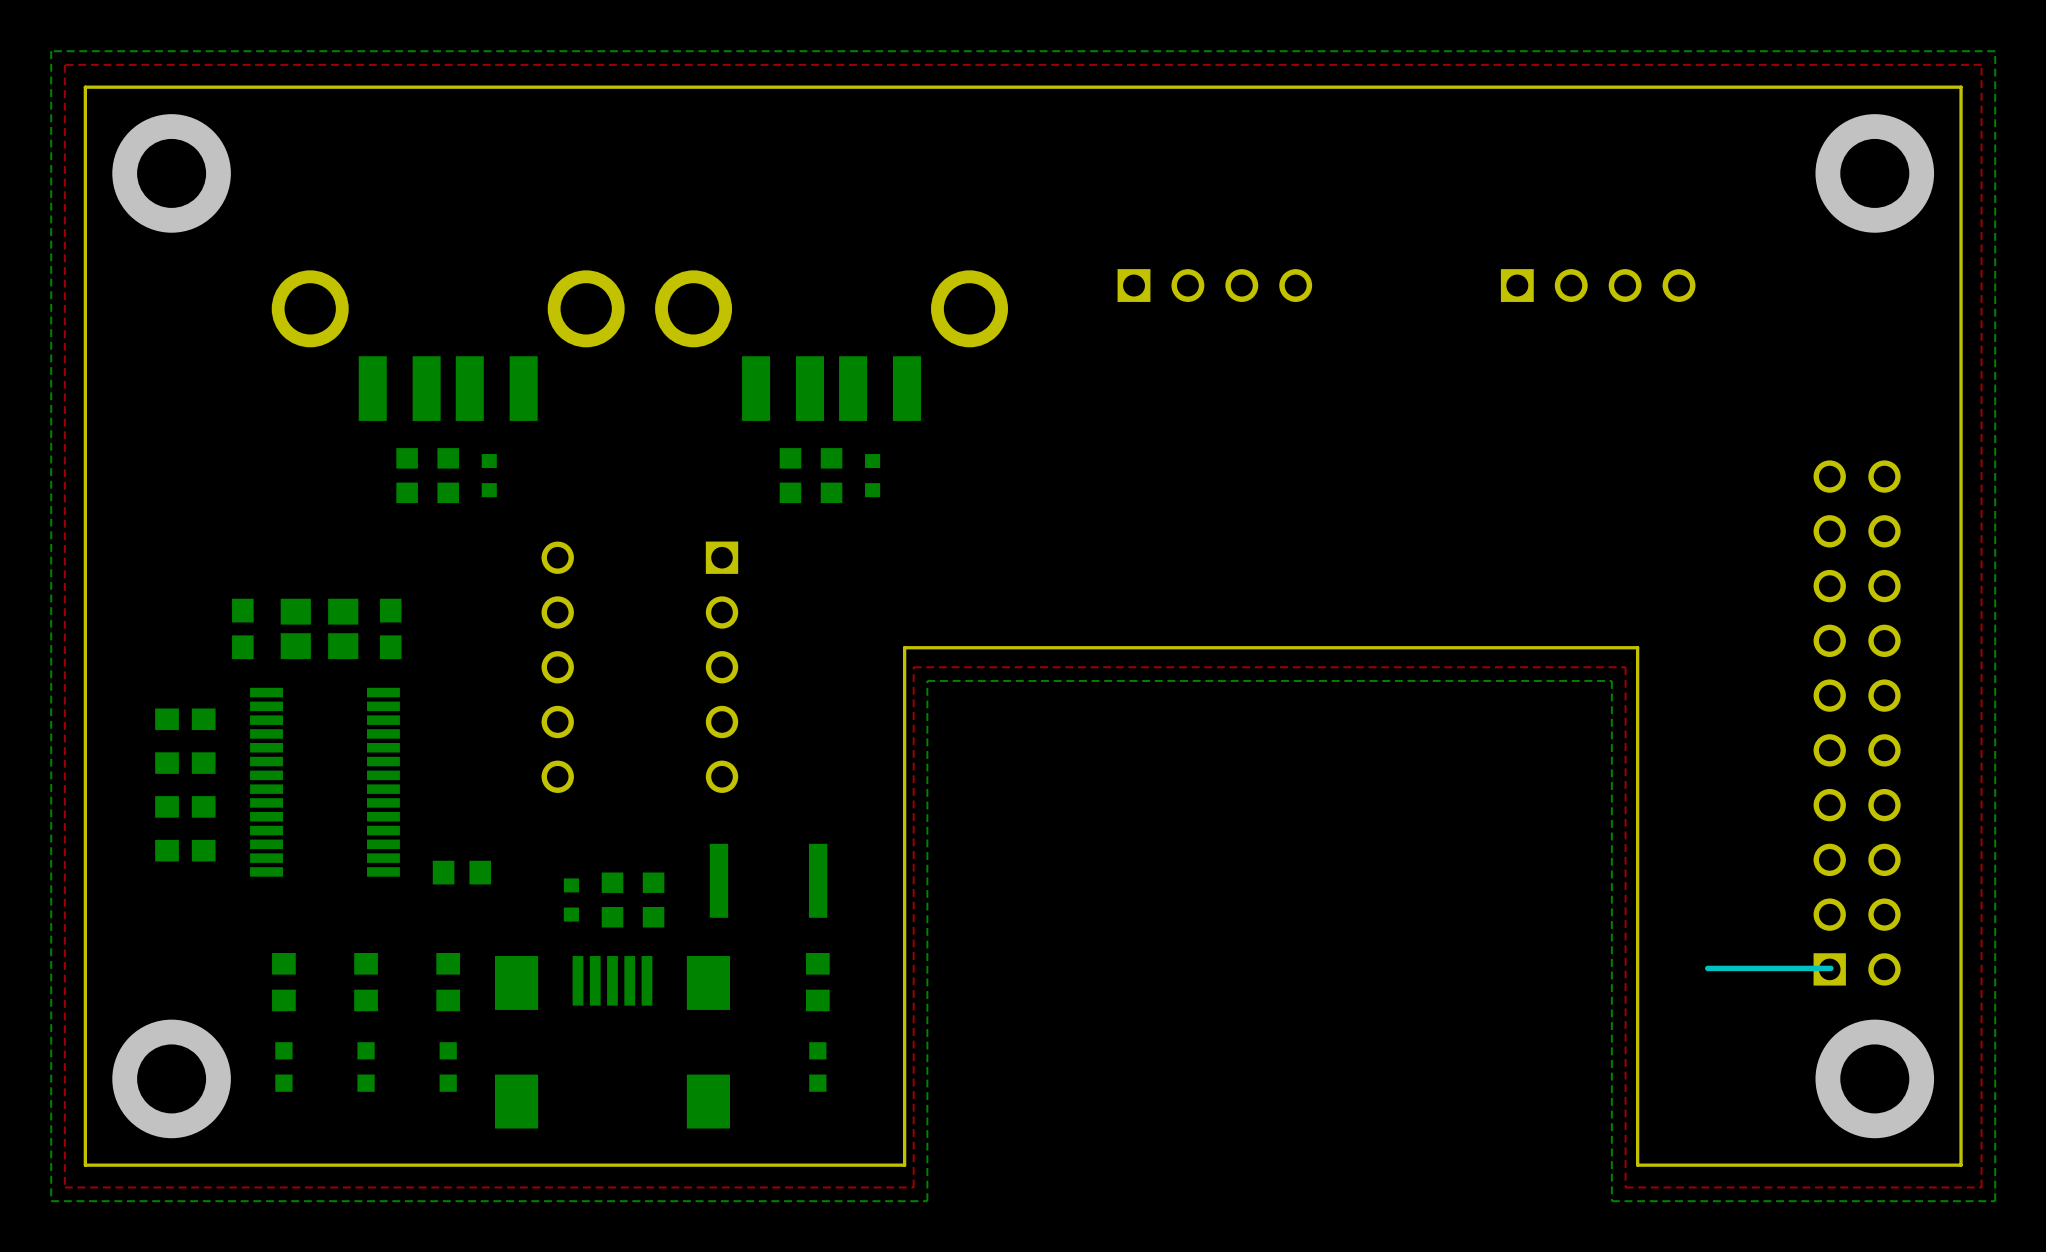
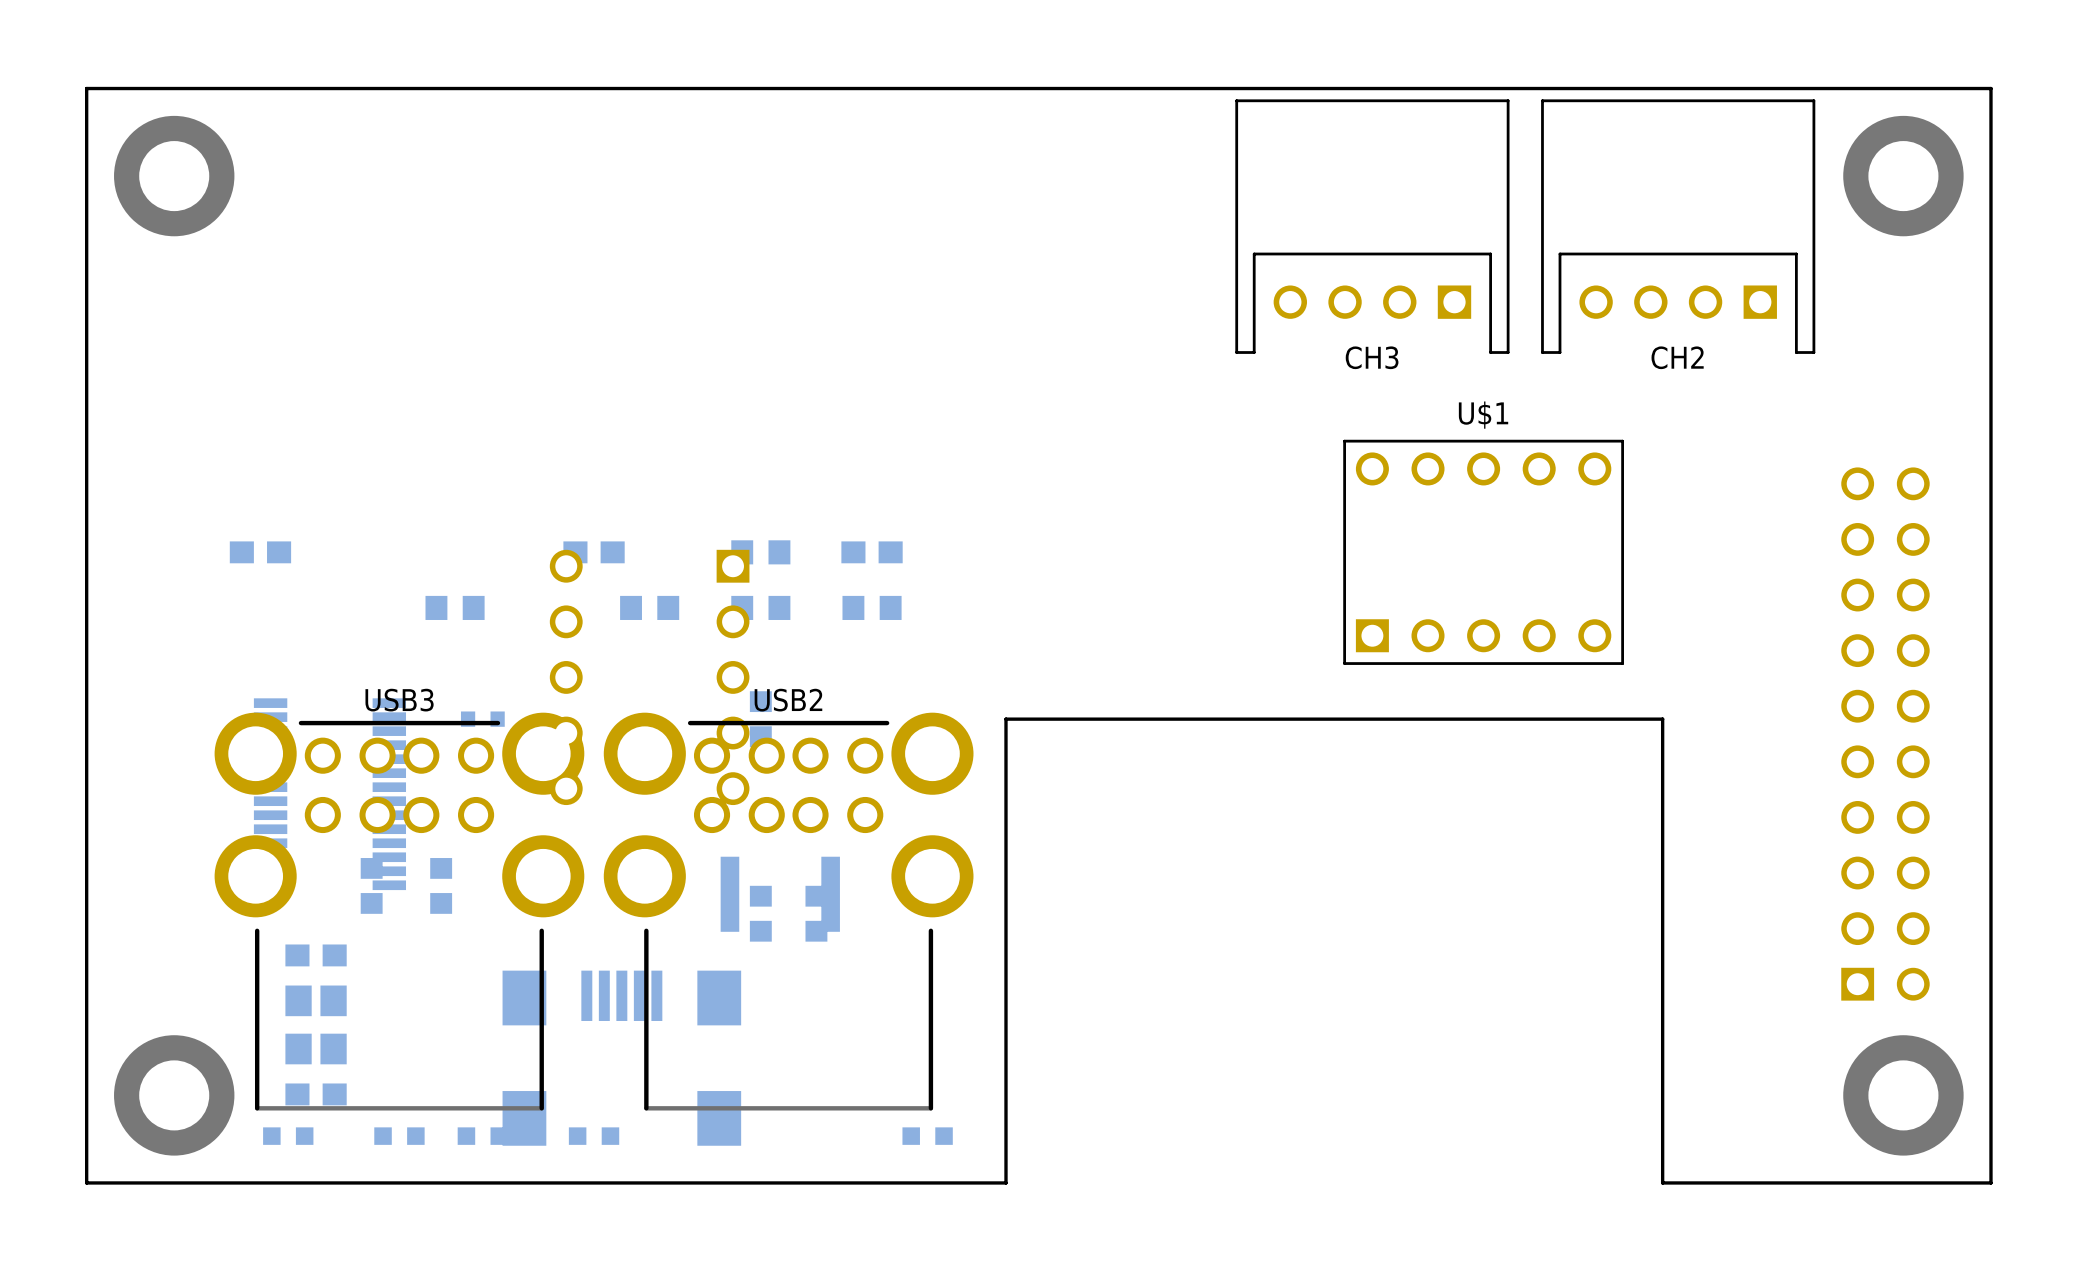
bottom zone outline: (51, 51) (51, 1201) (927, 1201) (927, 680) (1611, 680) (1611, 1201) (1995, 1201) (1995, 51) (51, 51) -> none
top zone outline: (64, 64) (64, 1187) (913, 1187) (913, 667) (1625, 667) (1625, 1187) (1981, 1187) (1981, 64) (64, 64) -> none
CH3 side: bottom (1214, 285) -> top (1372, 226)
CH2 side: bottom (1598, 285) -> top (1678, 226)
part: (448, 345) -> none
part: (831, 345) -> none
part: (407, 475) -> none
part: (448, 475) -> none
part: (489, 475) -> none
part: (790, 475) -> none
part: (831, 475) -> none
part: (872, 475) -> none
part: none -> (260, 552)
part: none -> (594, 552)
part: none -> (760, 552)
part: none -> (872, 552)
U$1: none -> (1483, 552)
part: none -> (455, 607)
part: none -> (649, 607)
part: none -> (760, 607)
part: none -> (872, 607)
part: (242, 628) -> none
part rotation: 0° (319, 628) -> 90° clockwise (316, 1024)
part position: (319, 628) -> (316, 1024)
part: (390, 628) -> none
part: none -> (482, 719)
part: none -> (760, 719)
board edge: (1637, 708) (1637, 647) (904, 647) (904, 1165) -> (1662, 719) (1005, 719) (1005, 1182) (918, 1182)
part: (185, 719) -> none
part: (185, 763) -> none
part: (185, 806) -> none
part: (185, 850) -> none
part: none -> (371, 885)
part: none -> (441, 885)
part: (461, 872) -> none
USB3: none -> (399, 911)
USB2: none -> (788, 911)
part: (571, 899) -> none
part: (612, 899) -> none
part: (653, 899) -> none
part: none -> (760, 913)
part: none -> (816, 913)
part: none -> (316, 955)
line: (1707, 968) (1830, 968) -> none
part: (283, 982) -> none
part: (366, 982) -> none
part: (448, 982) -> none
part: (817, 982) -> none
part: (283, 1067) -> none
part: (366, 1067) -> none
part: (448, 1067) -> none
part rotation: 0° (817, 1067) -> 90° clockwise (927, 1136)
part position: (817, 1067) -> (927, 1136)
part: none -> (316, 1094)
part: none -> (288, 1136)
part: none -> (399, 1136)
part: none -> (482, 1136)
part: none -> (594, 1136)

